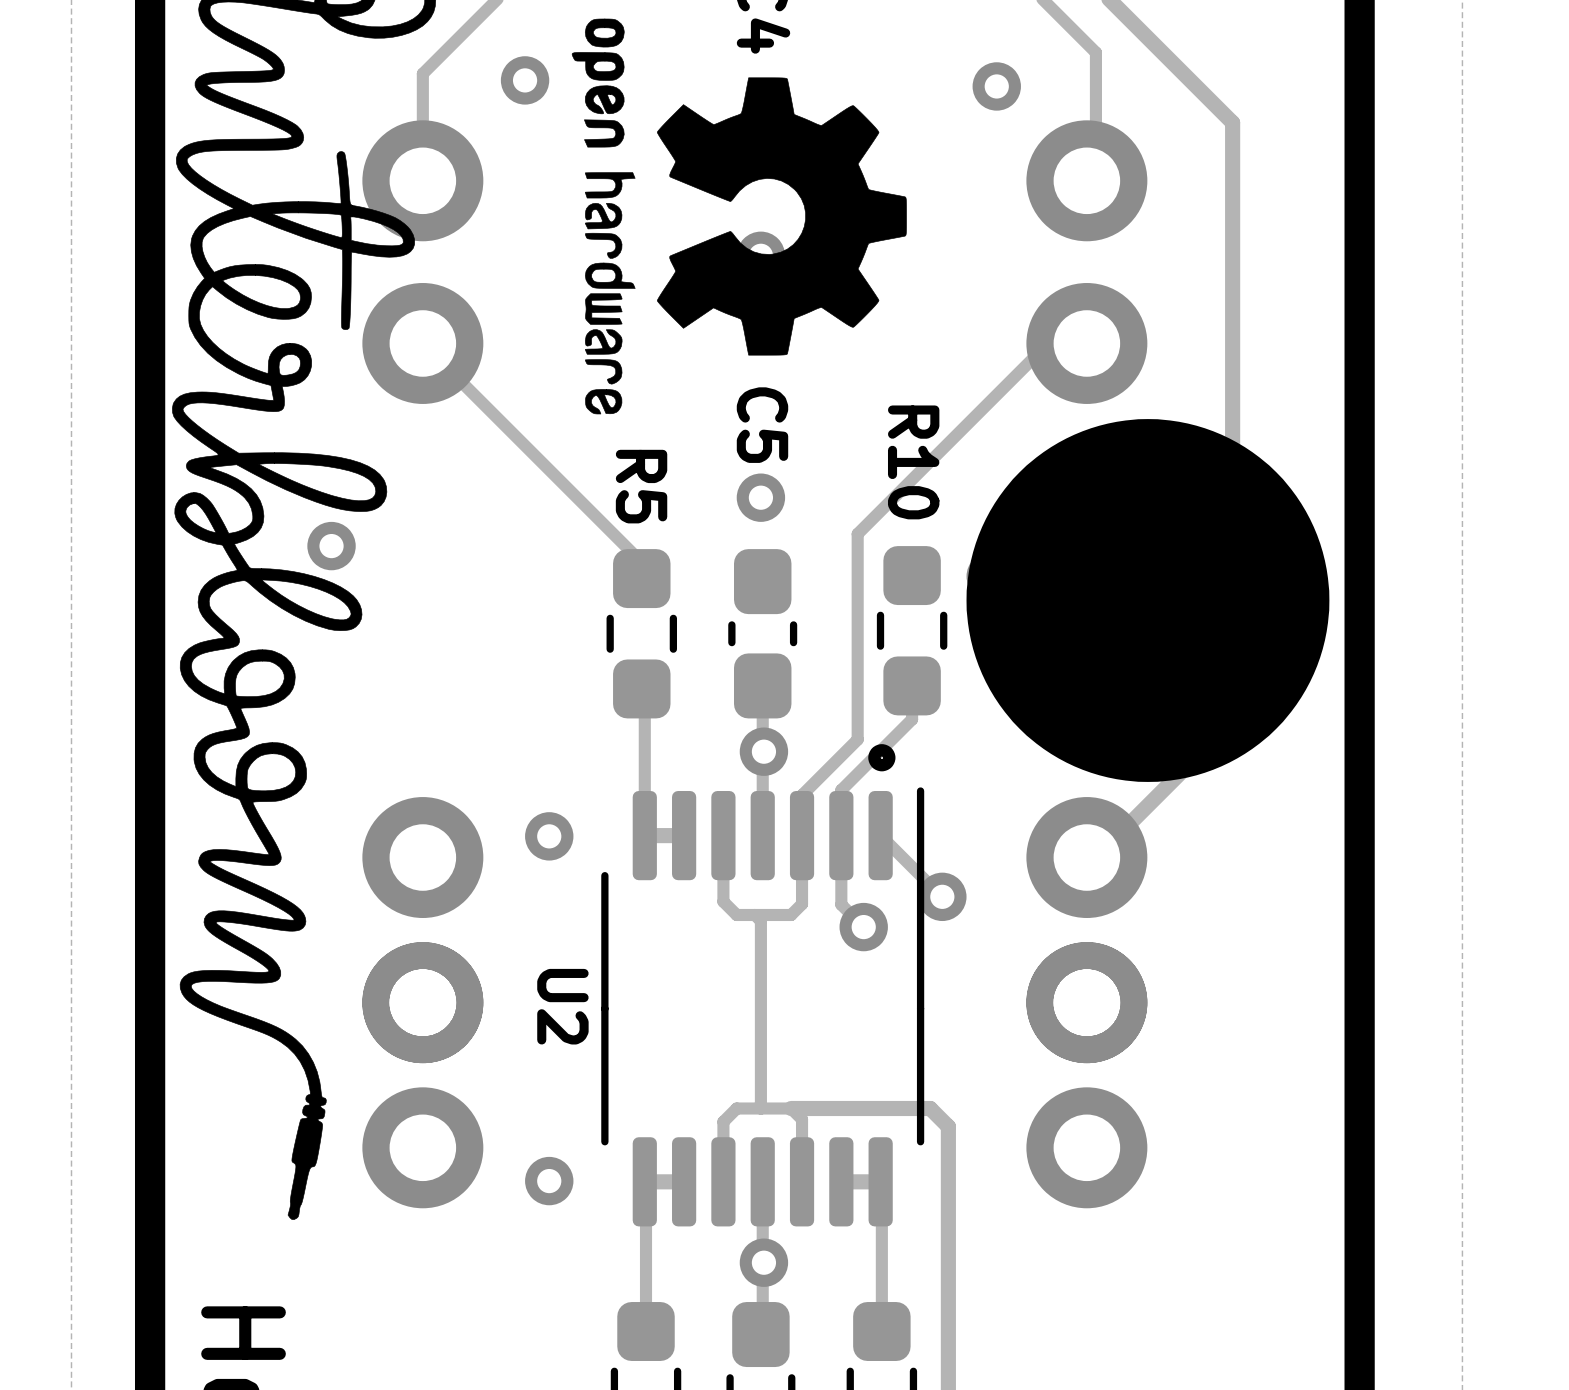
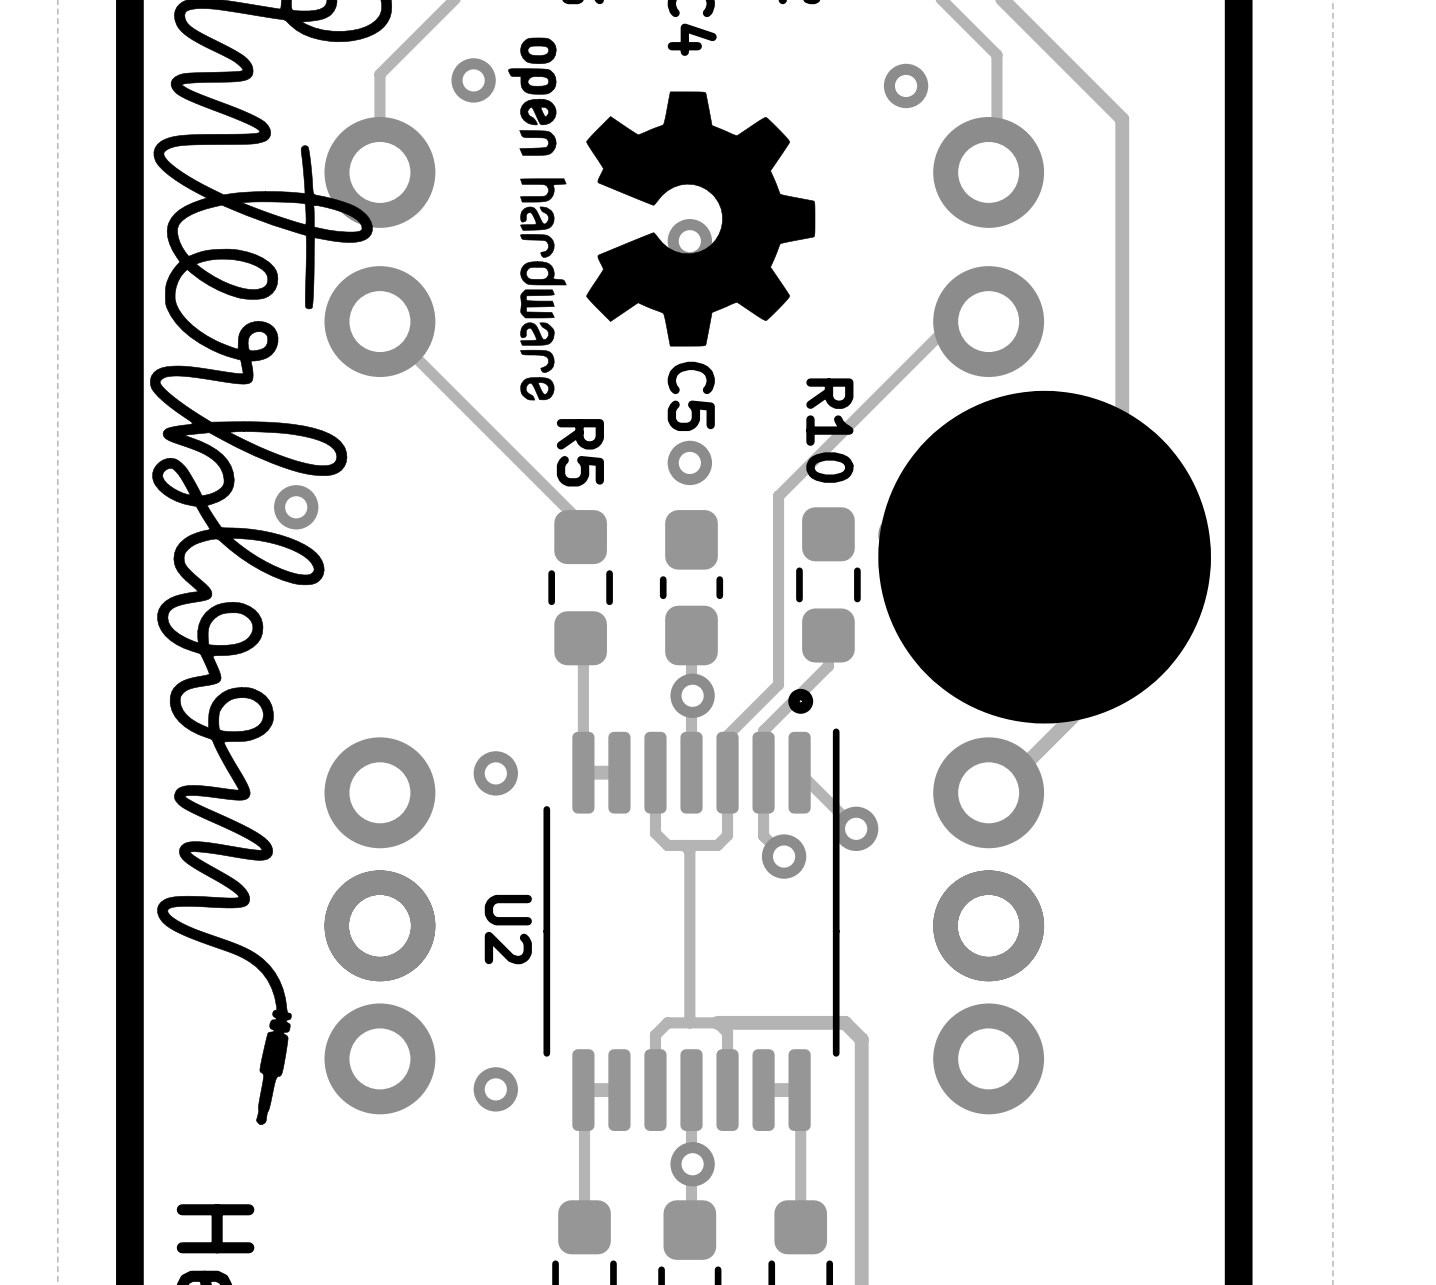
drawing position: (739, 216) -> (661, 219)

